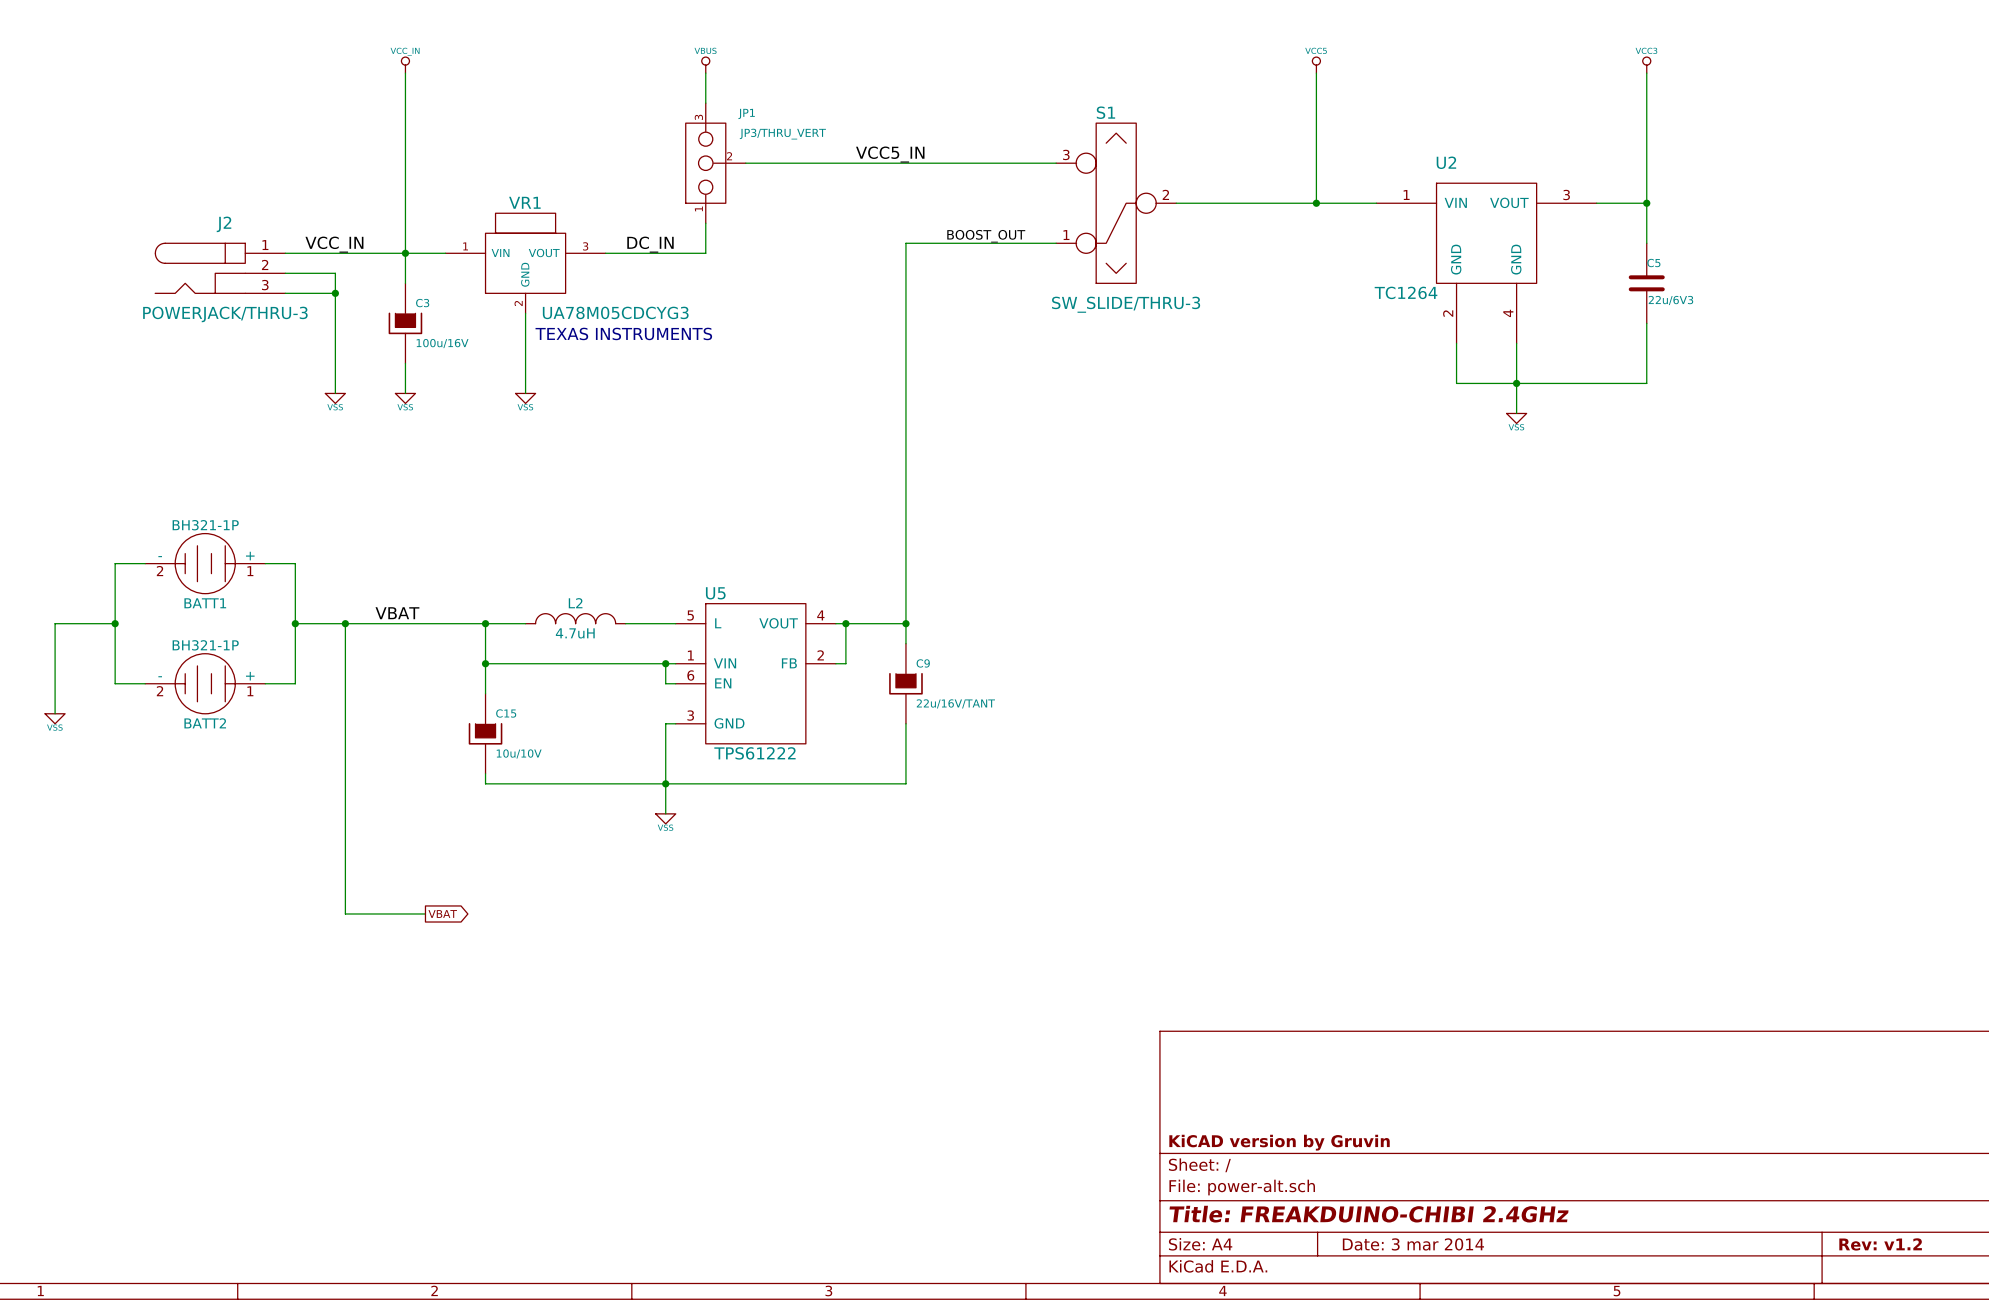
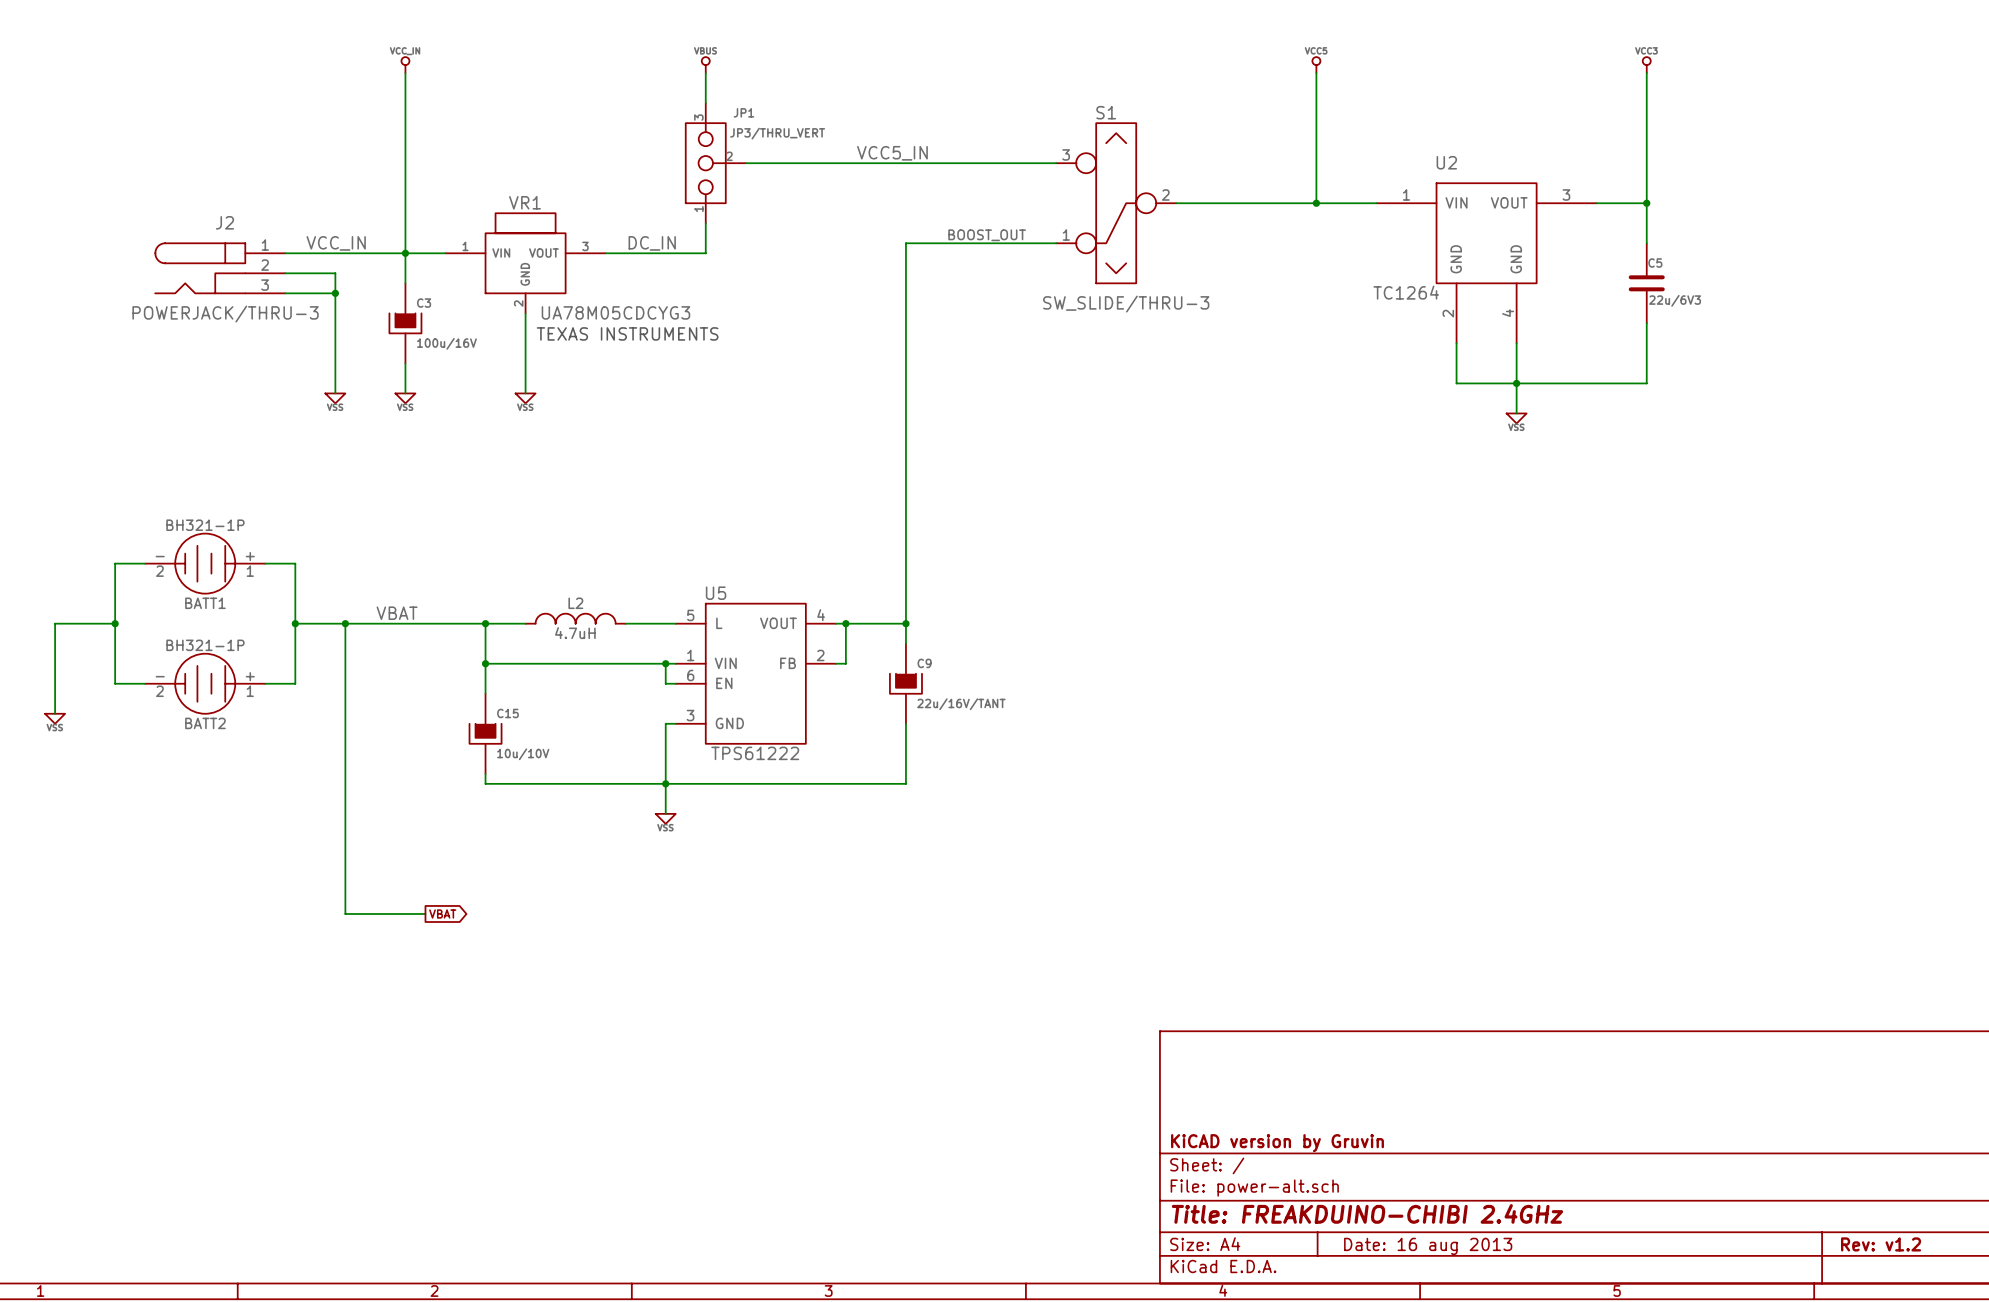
title block: Date: 3 mar 2014 (1413, 1244) -> Date: 16 aug 2013 (1428, 1246)

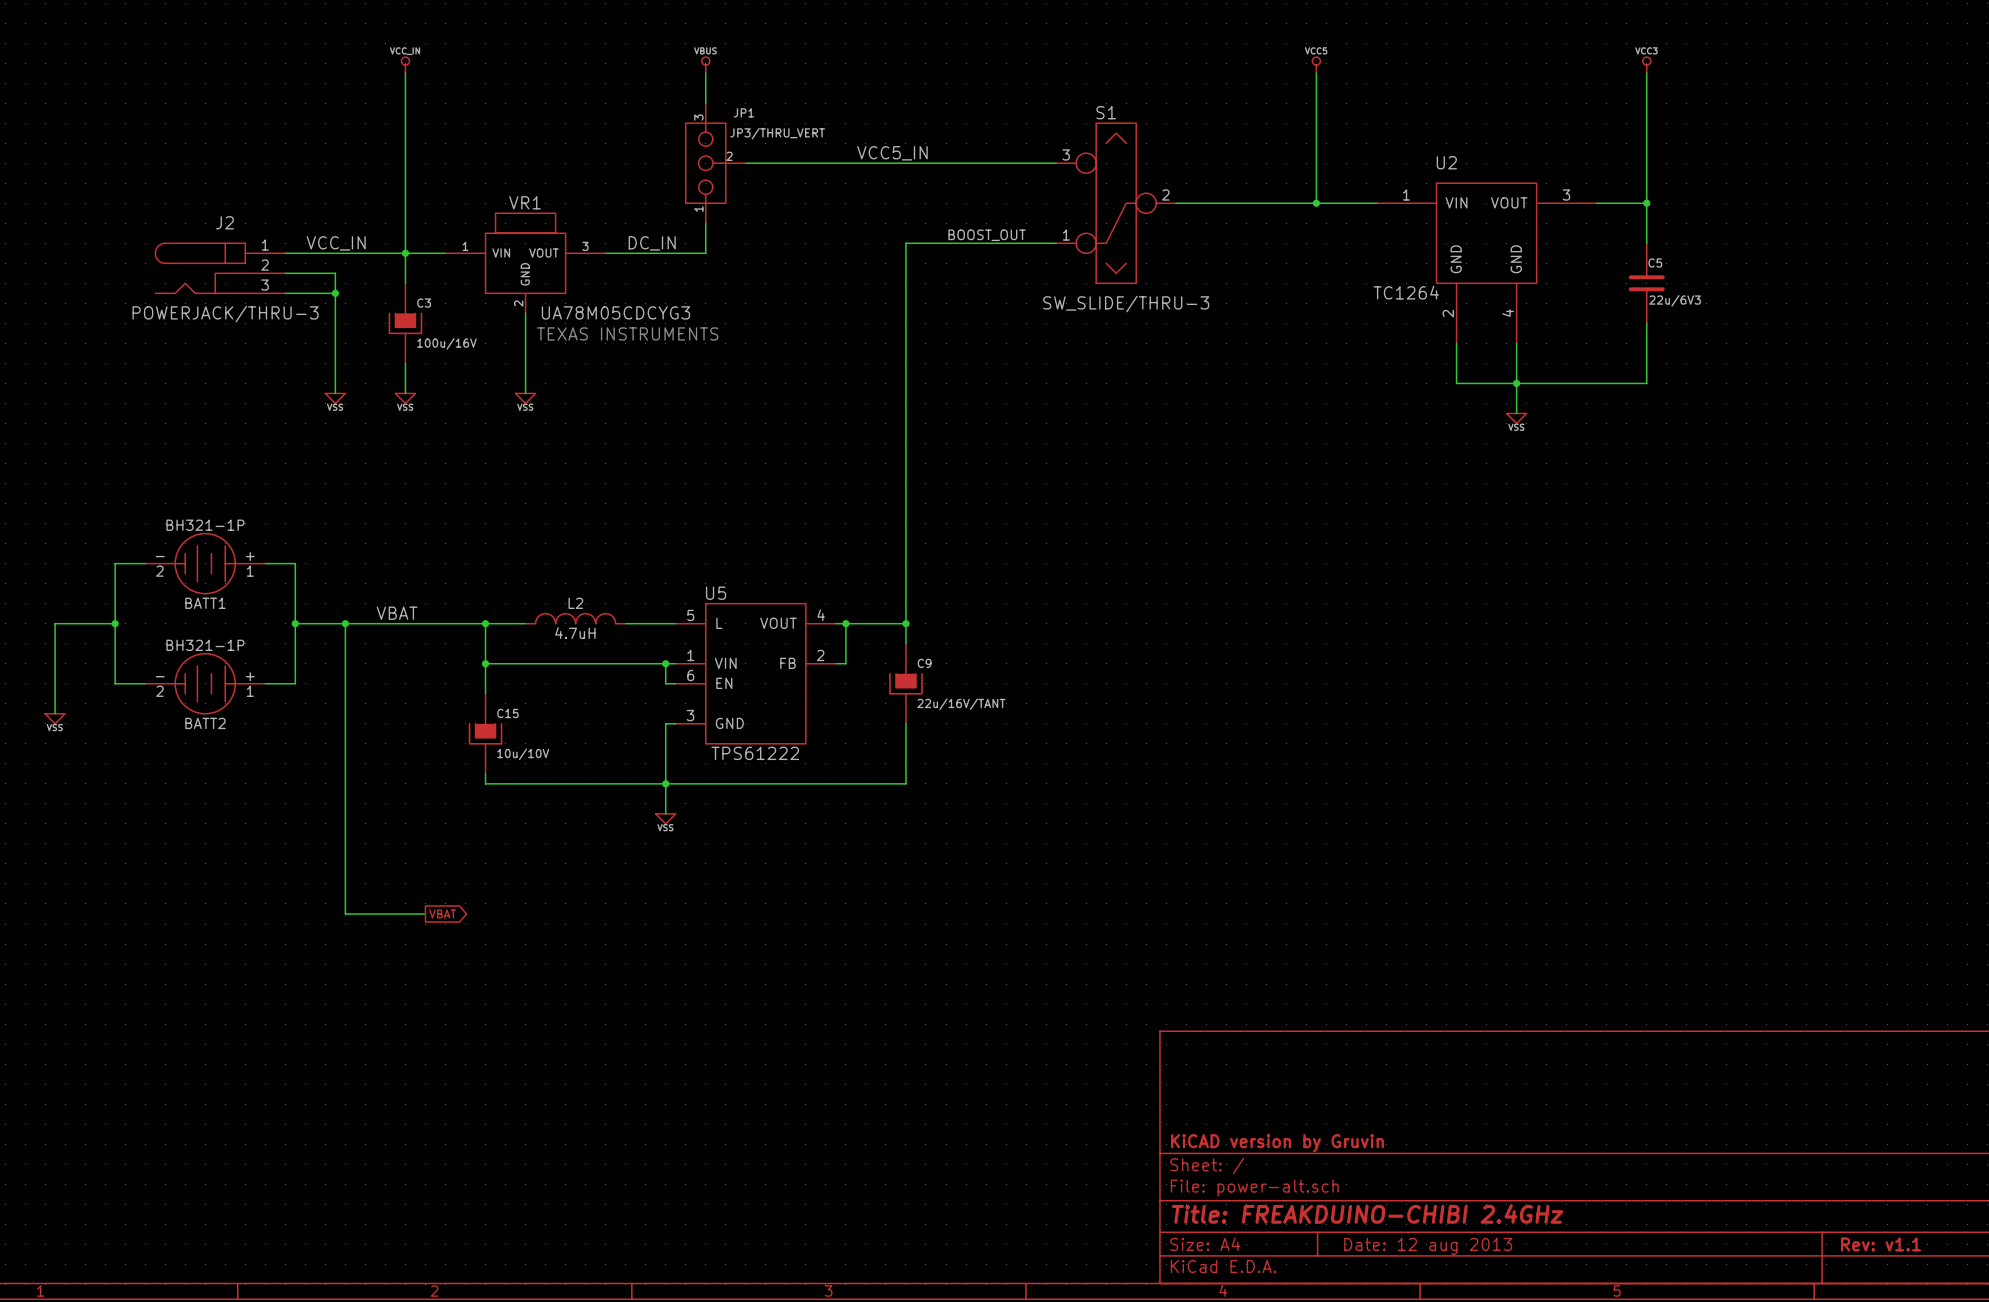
title block: Rev: v1.2 (1881, 1244) -> Rev: v1.1 (1881, 1244)
title block: Date: 16 aug 2013 (1428, 1246) -> Date: 12 aug 2013 (1428, 1246)

